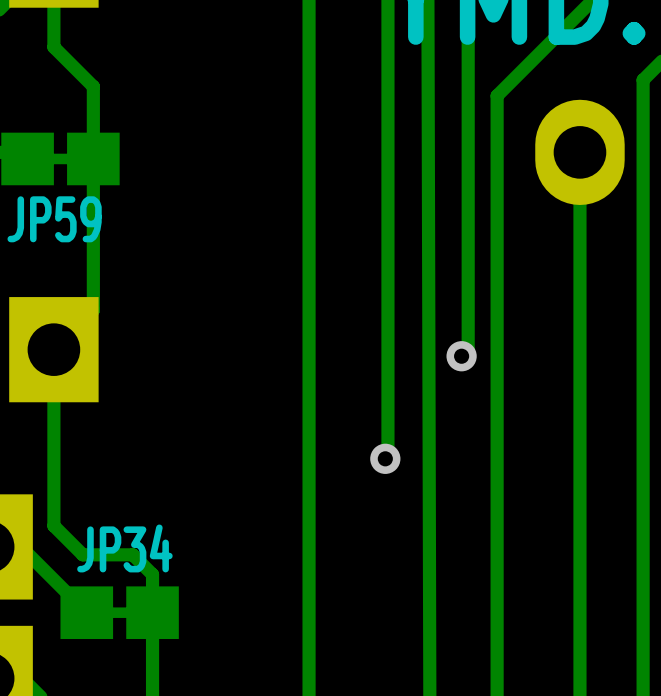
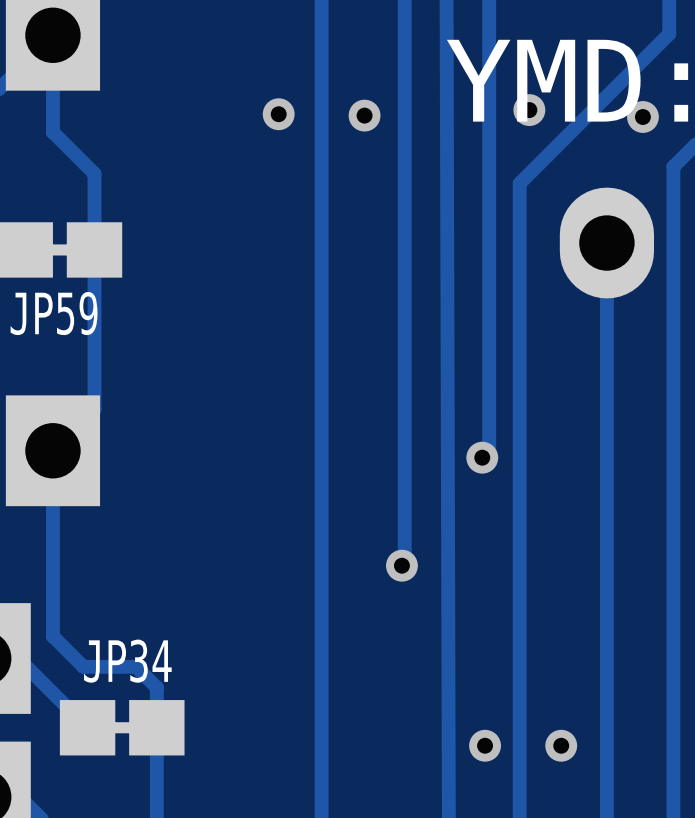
via: none -> (529, 110)
via: none -> (278, 114)
via: none -> (364, 115)
via: none -> (642, 117)
via: none -> (485, 745)
via: none -> (561, 745)

